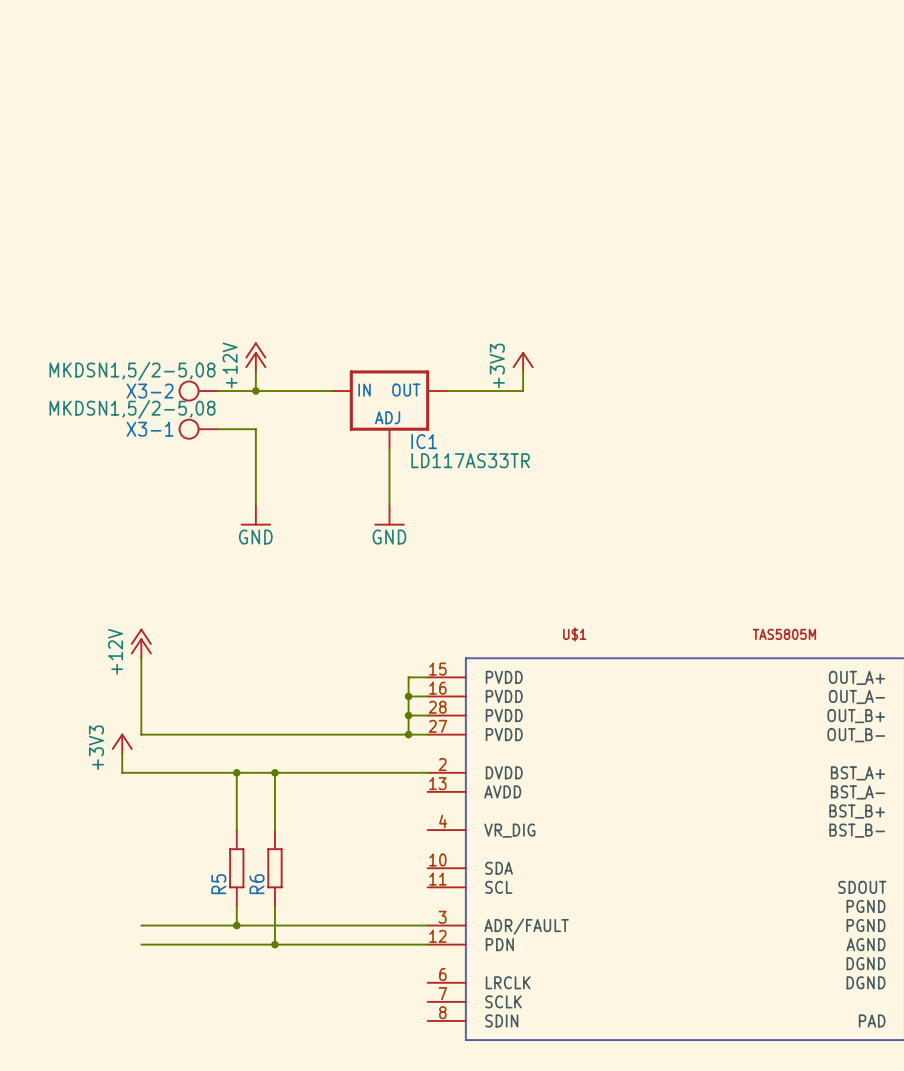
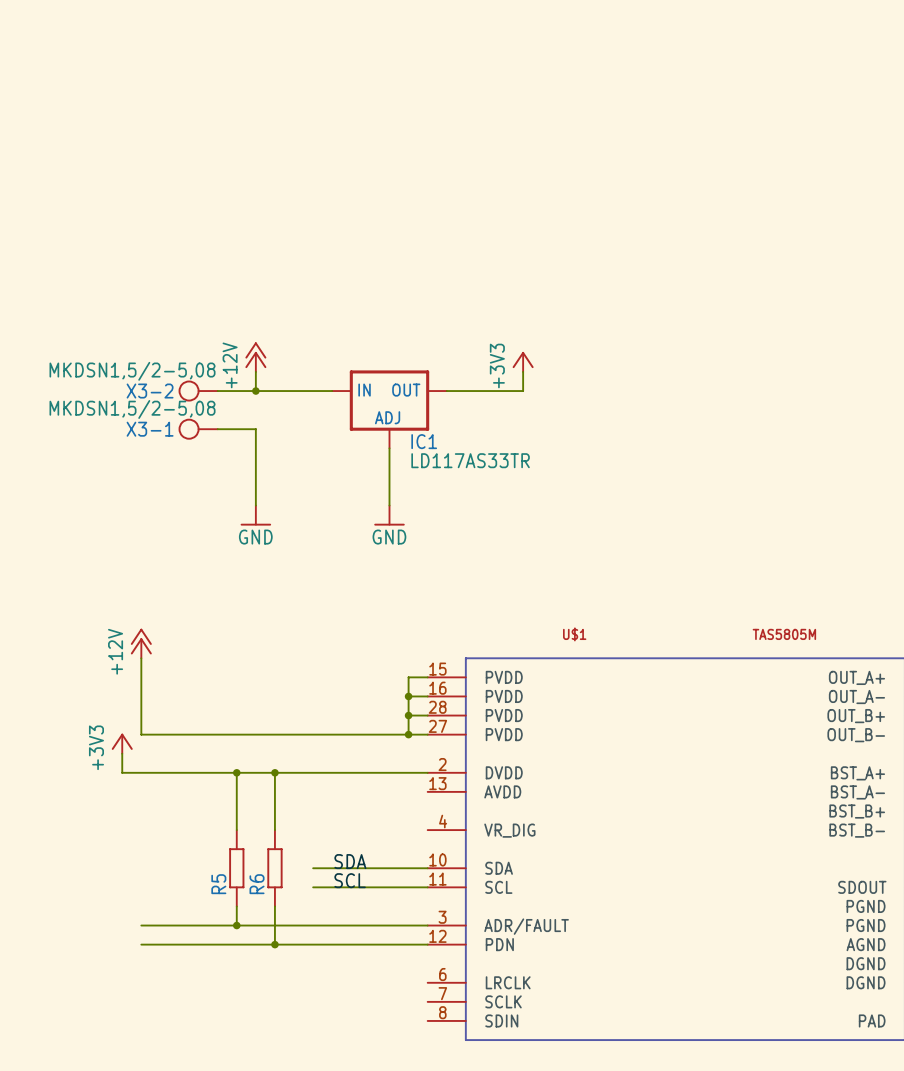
label: none -> SDA (350, 861)
wire: none -> (313, 868) (427, 868)
label: none -> SCL (350, 880)
wire: none -> (313, 887) (427, 887)

